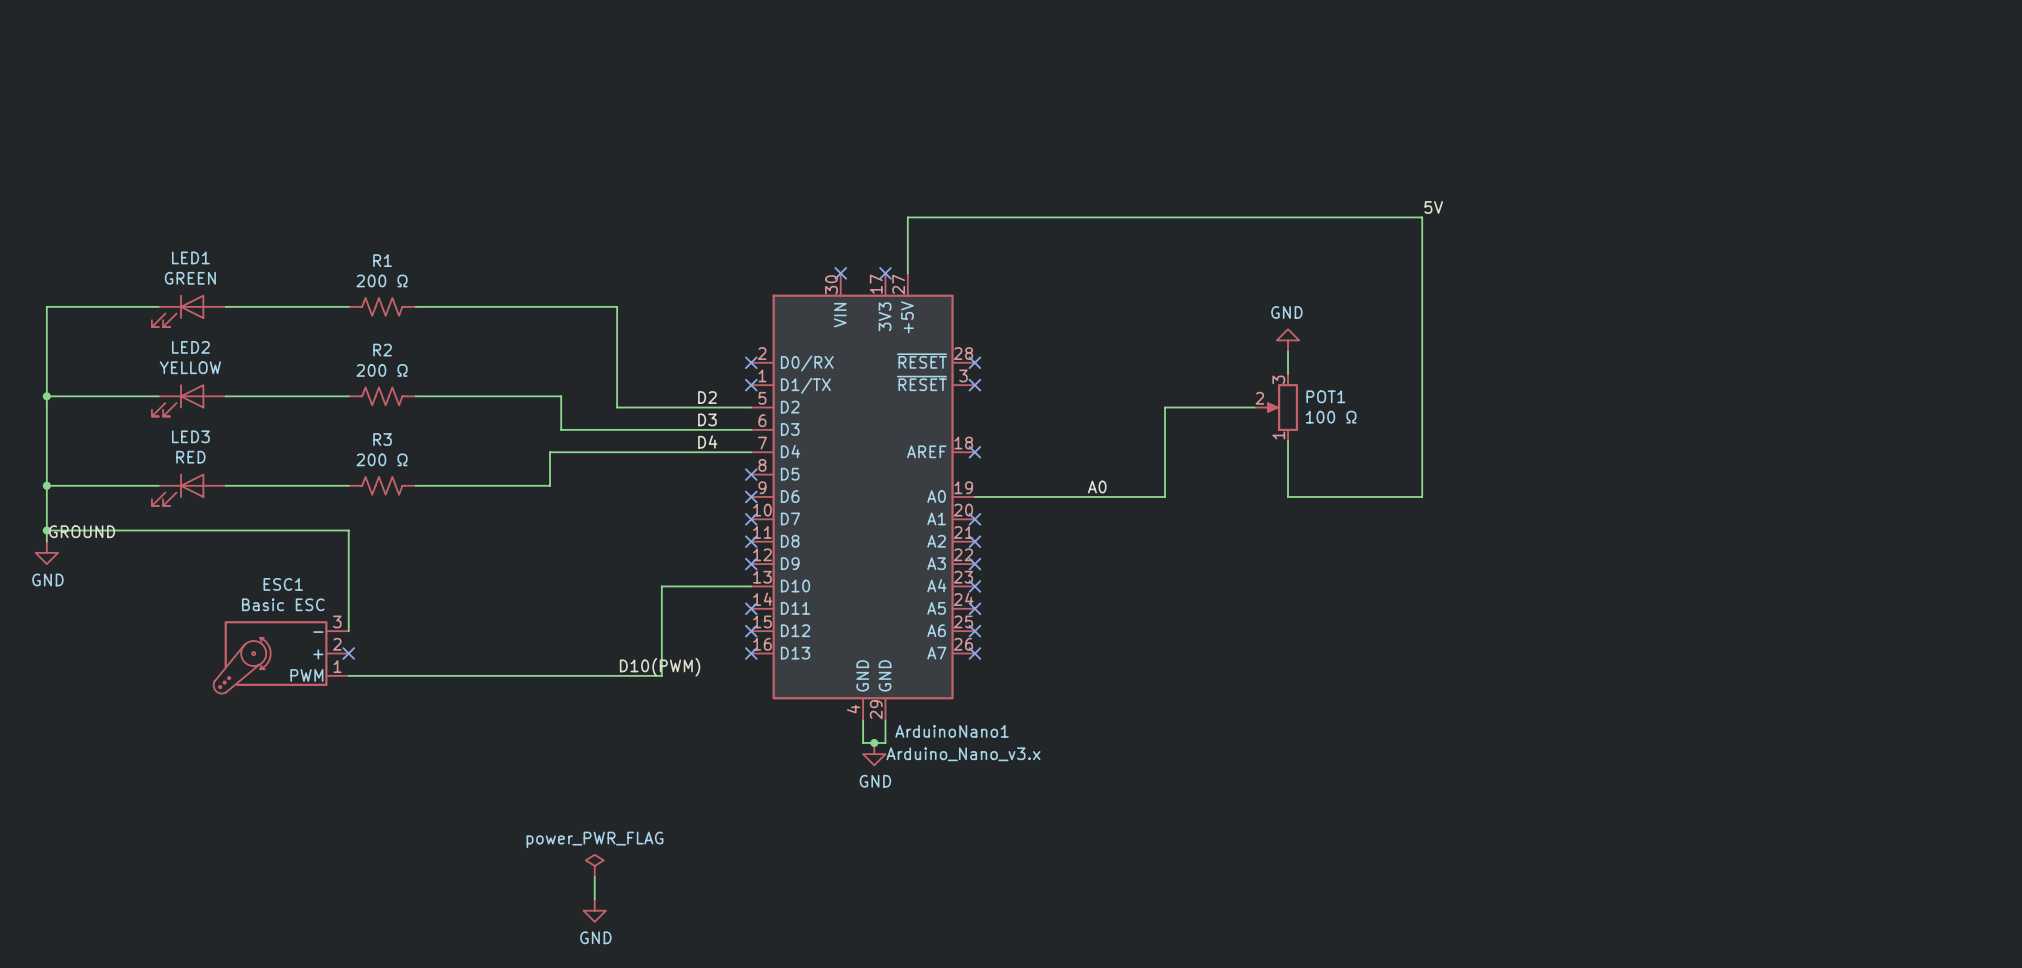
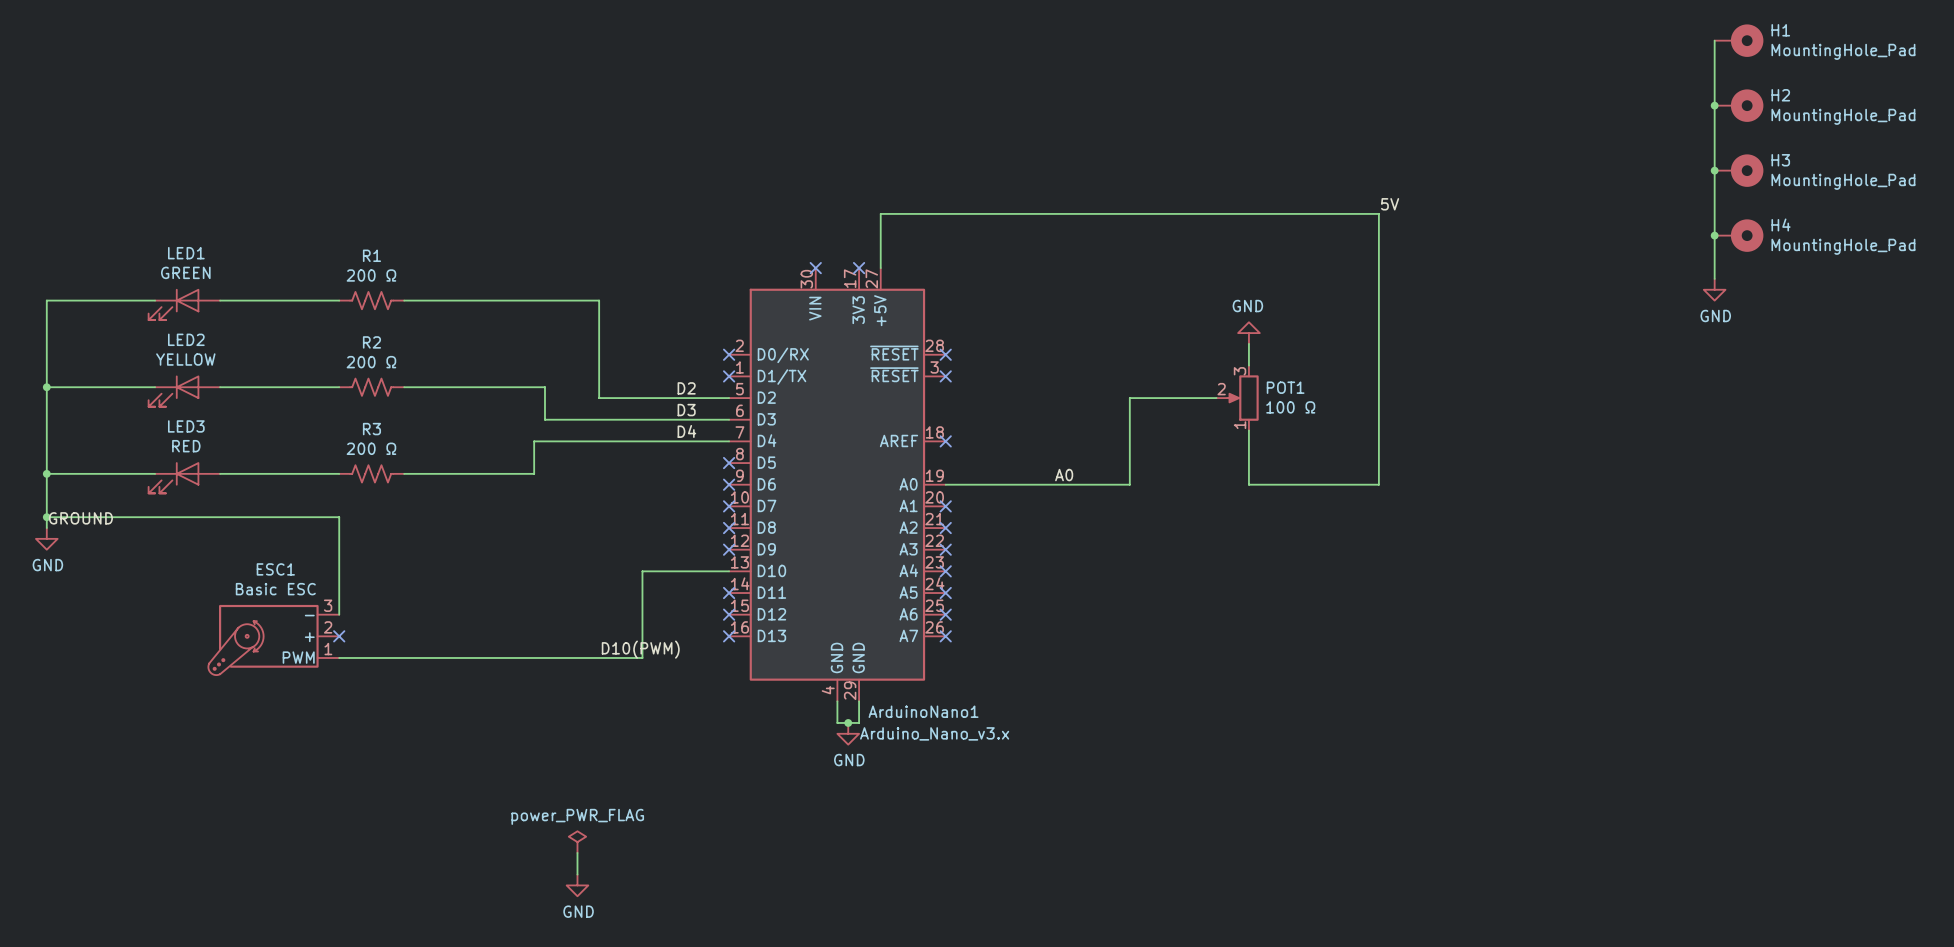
wire: none -> (1714, 40) (1714, 278)
H1: none -> MountingHole_Pad (1739, 40)
junction: none -> (1714, 105)
H2: none -> MountingHole_Pad (1739, 105)
junction: none -> (1714, 170)
H3: none -> MountingHole_Pad (1739, 170)
junction: none -> (1714, 235)
H4: none -> MountingHole_Pad (1739, 235)
power symbol: none -> GND (1714, 289)

